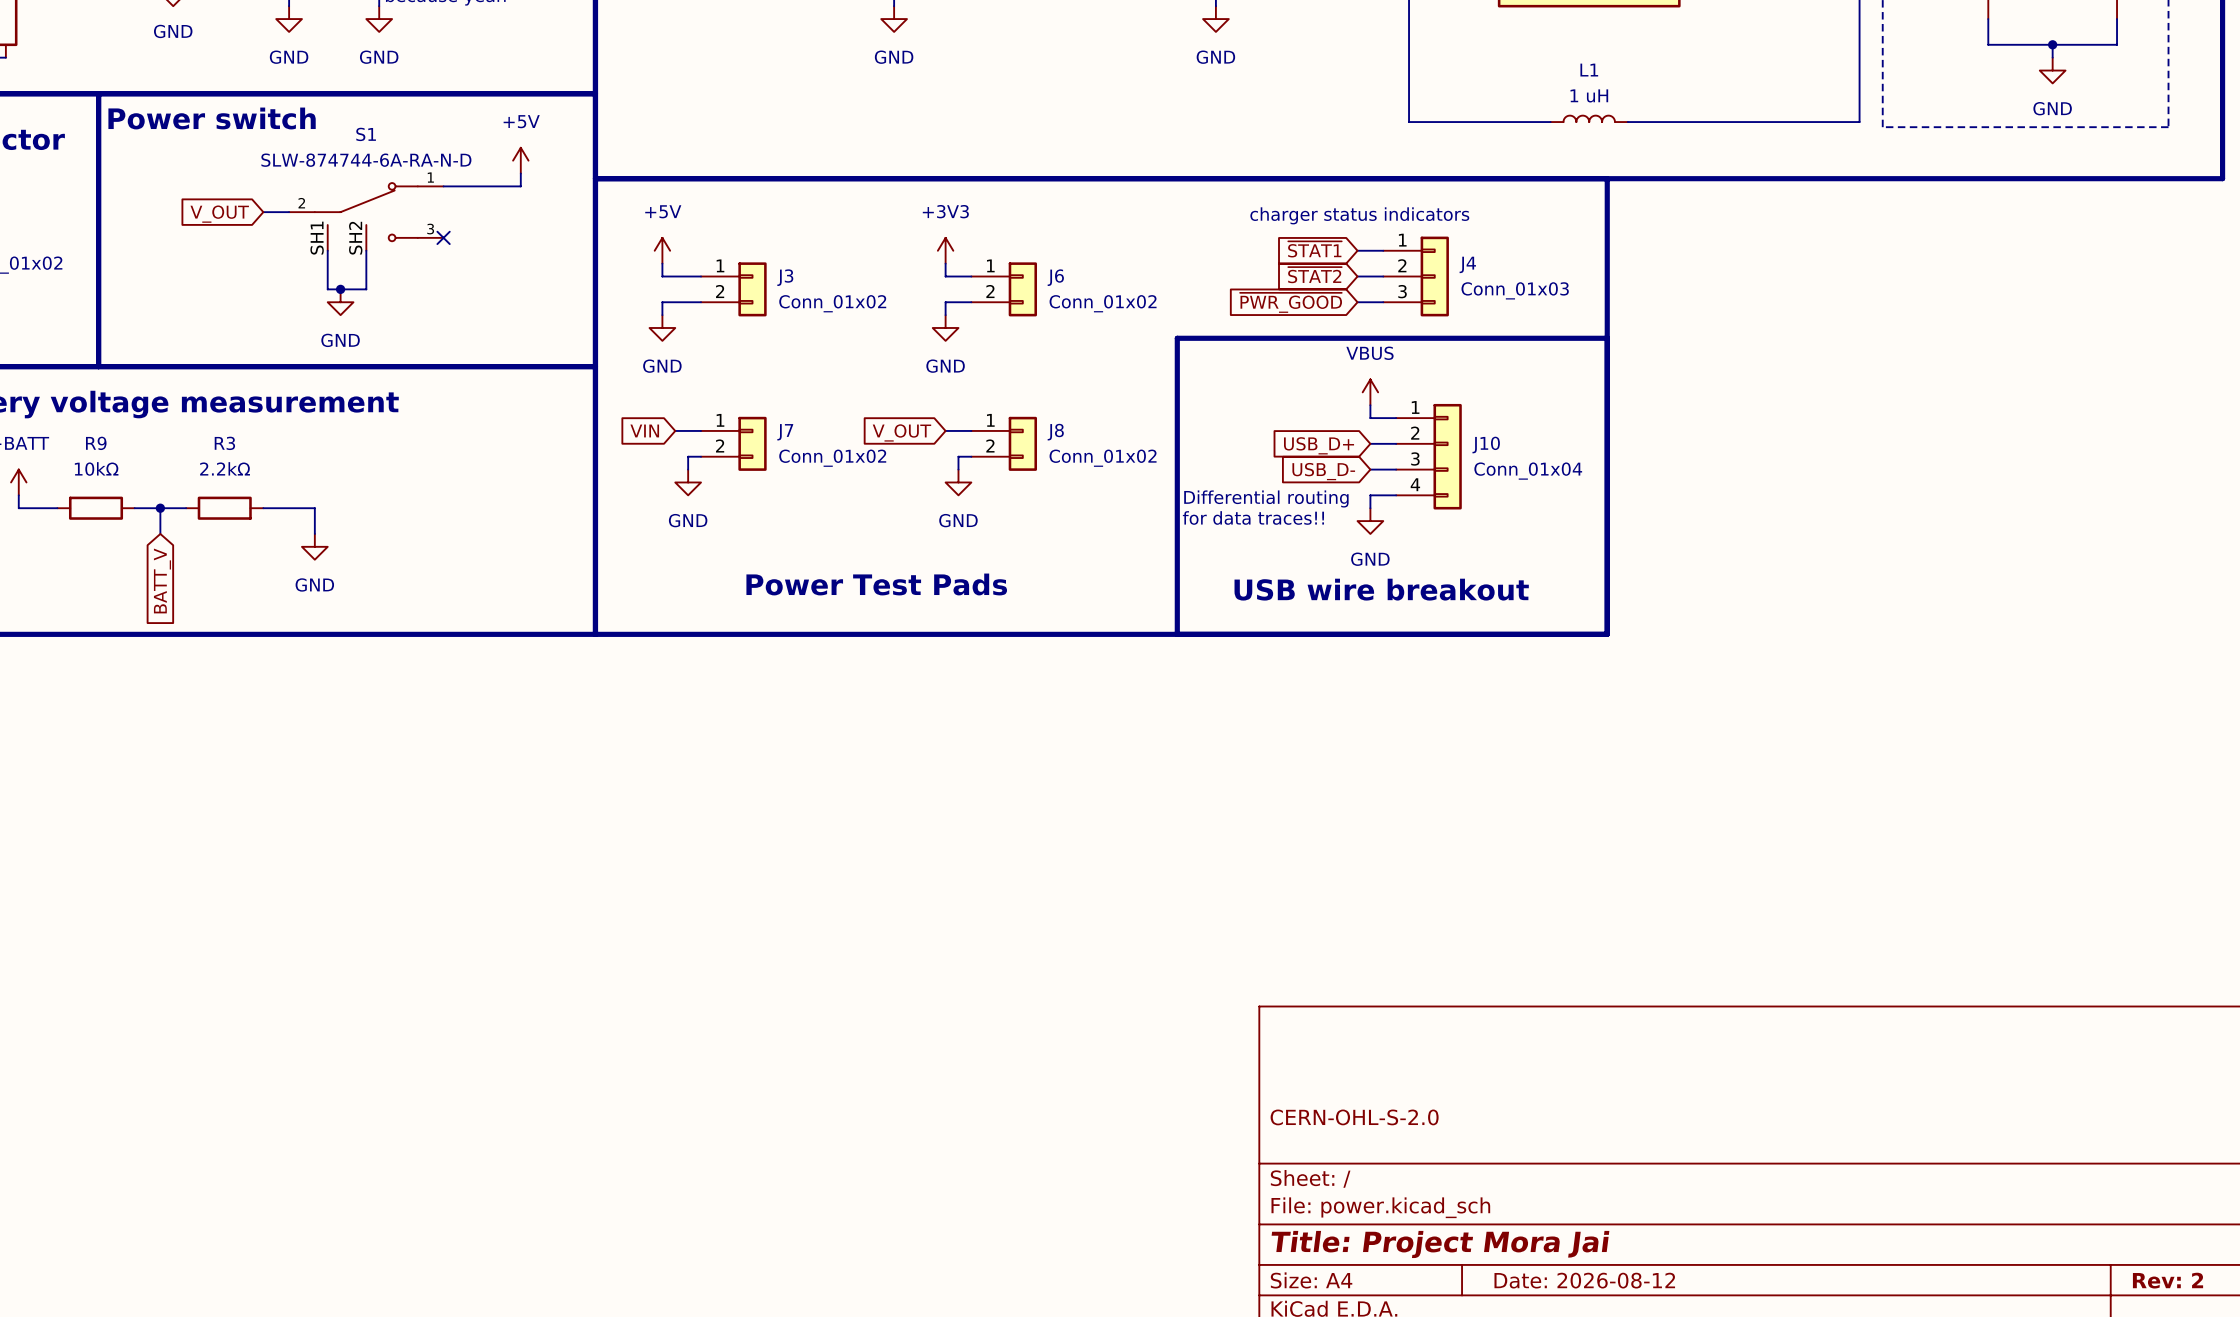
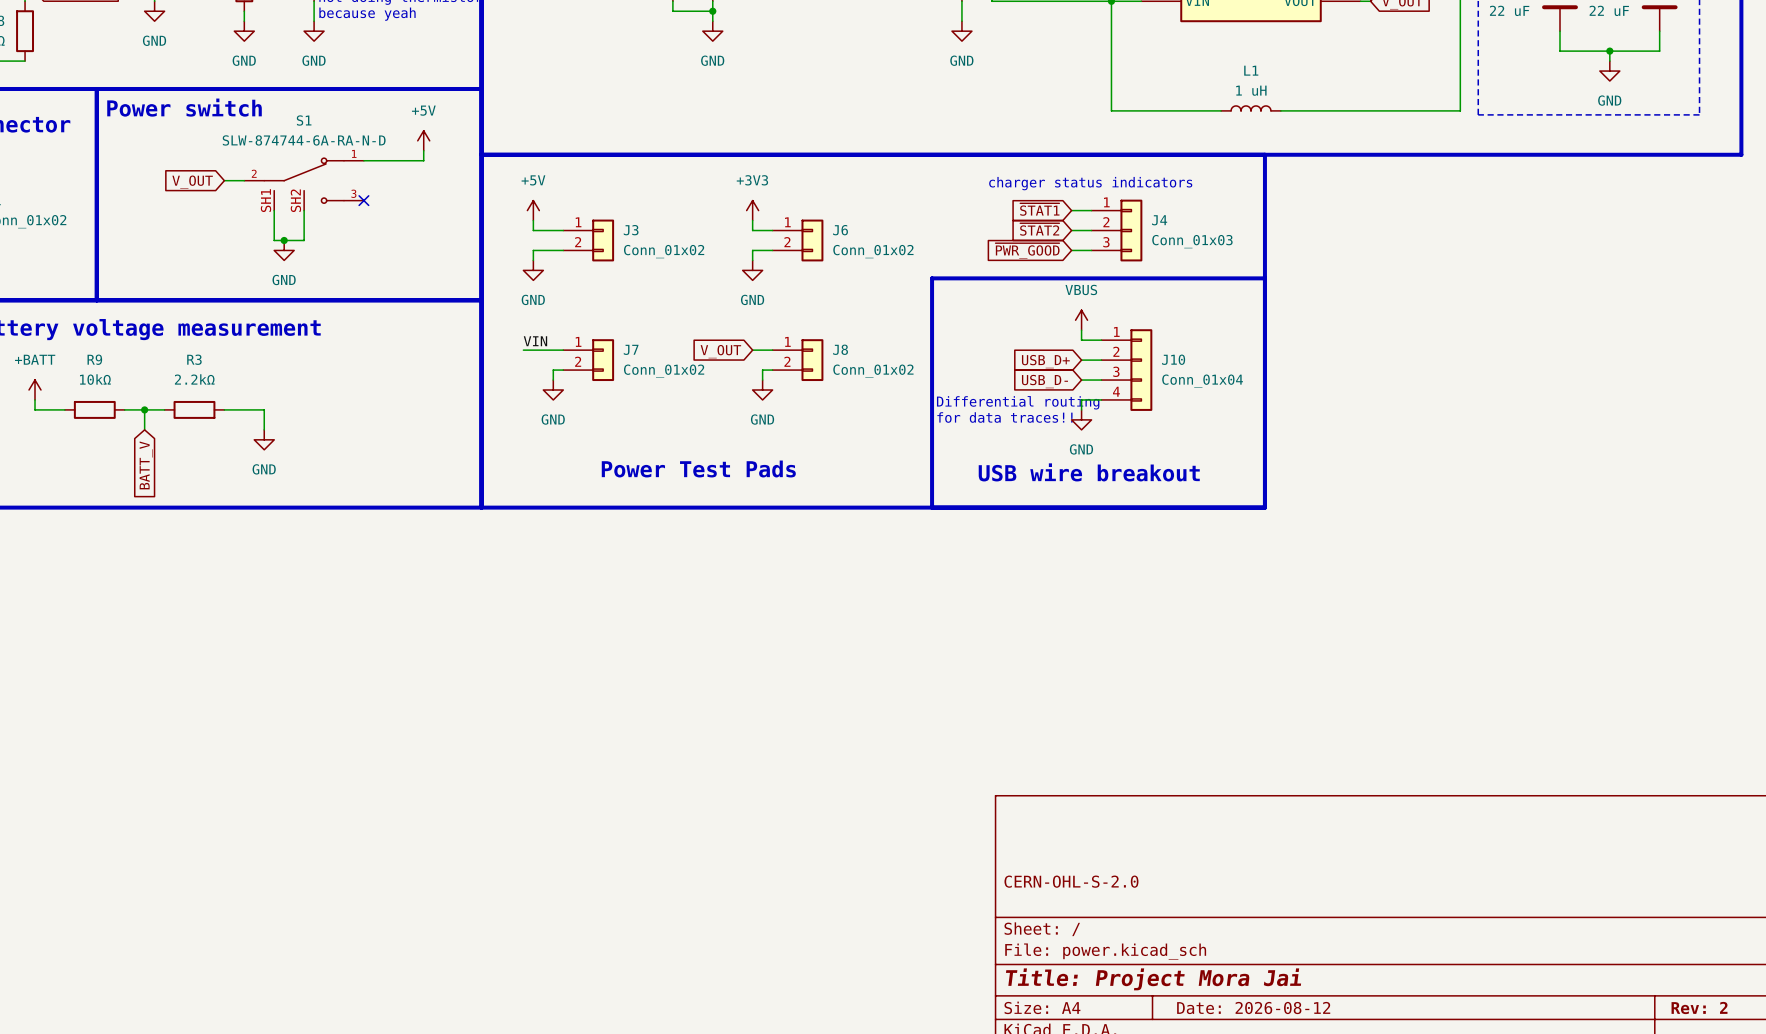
label: none -> VIN (535, 341)
global label: VIN (644, 430) -> none
wire: none -> (523, 350) (543, 350)

